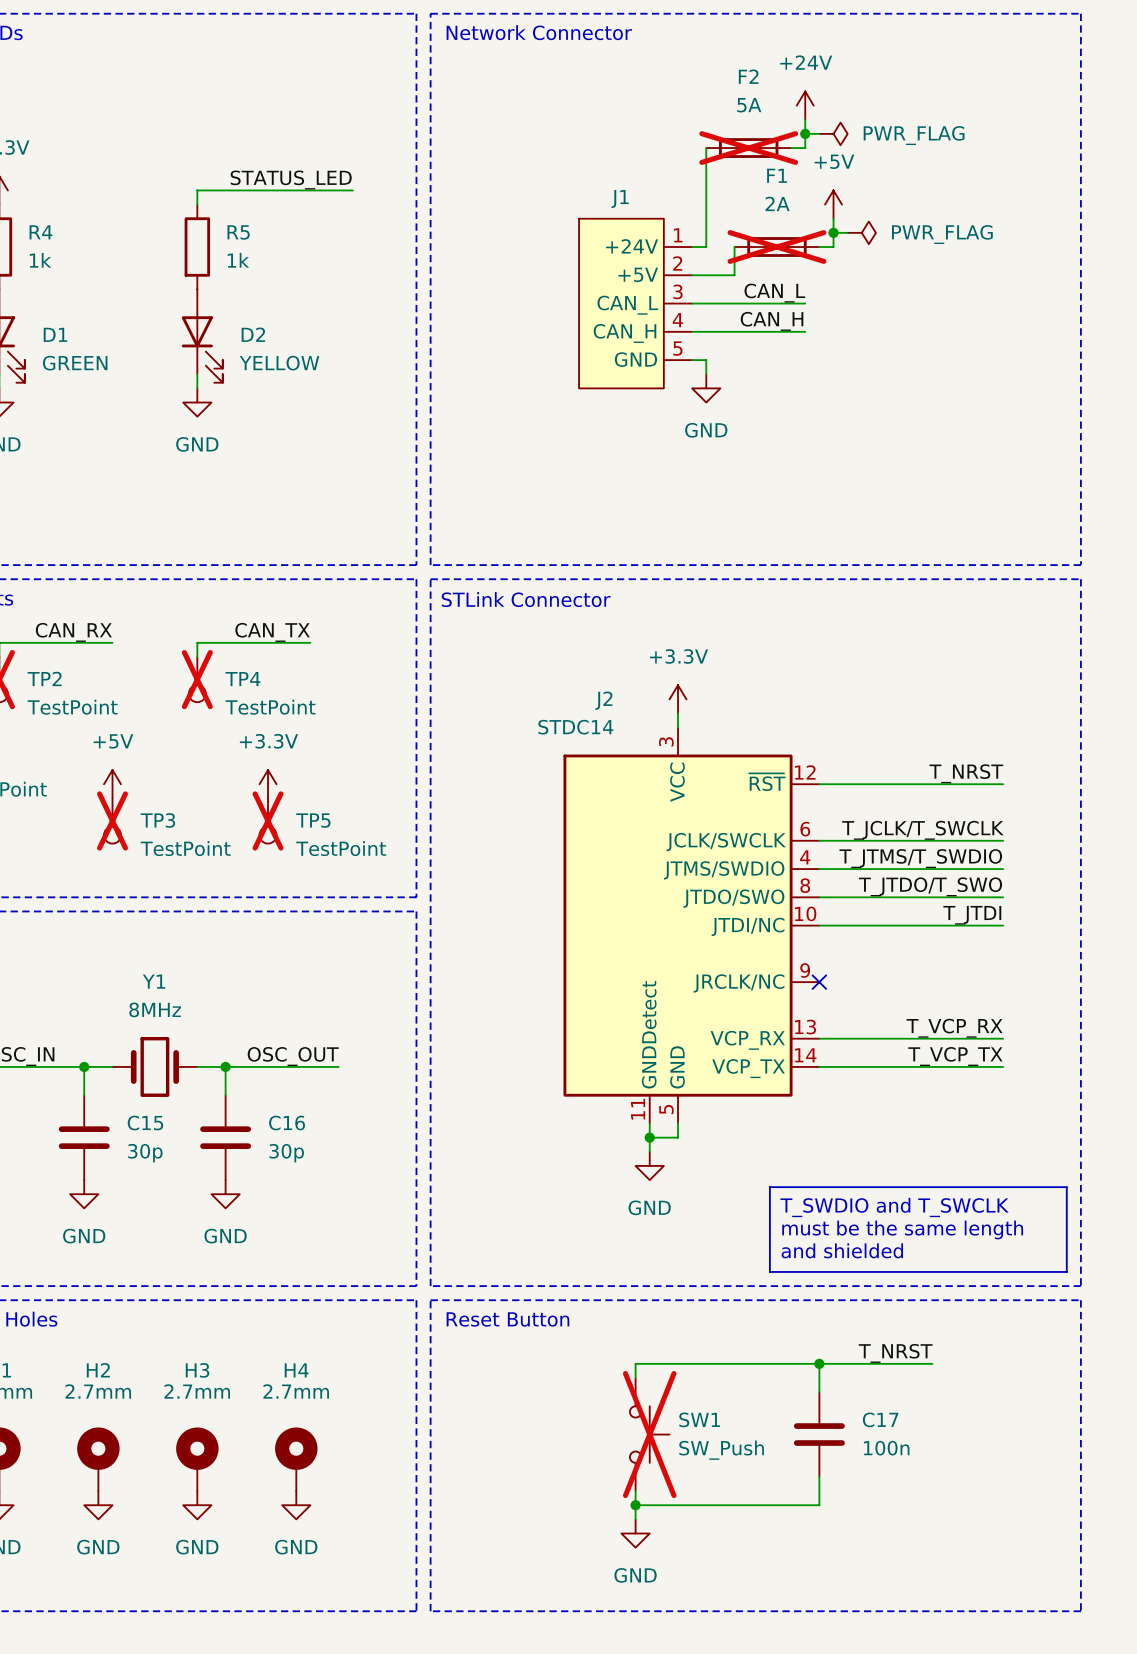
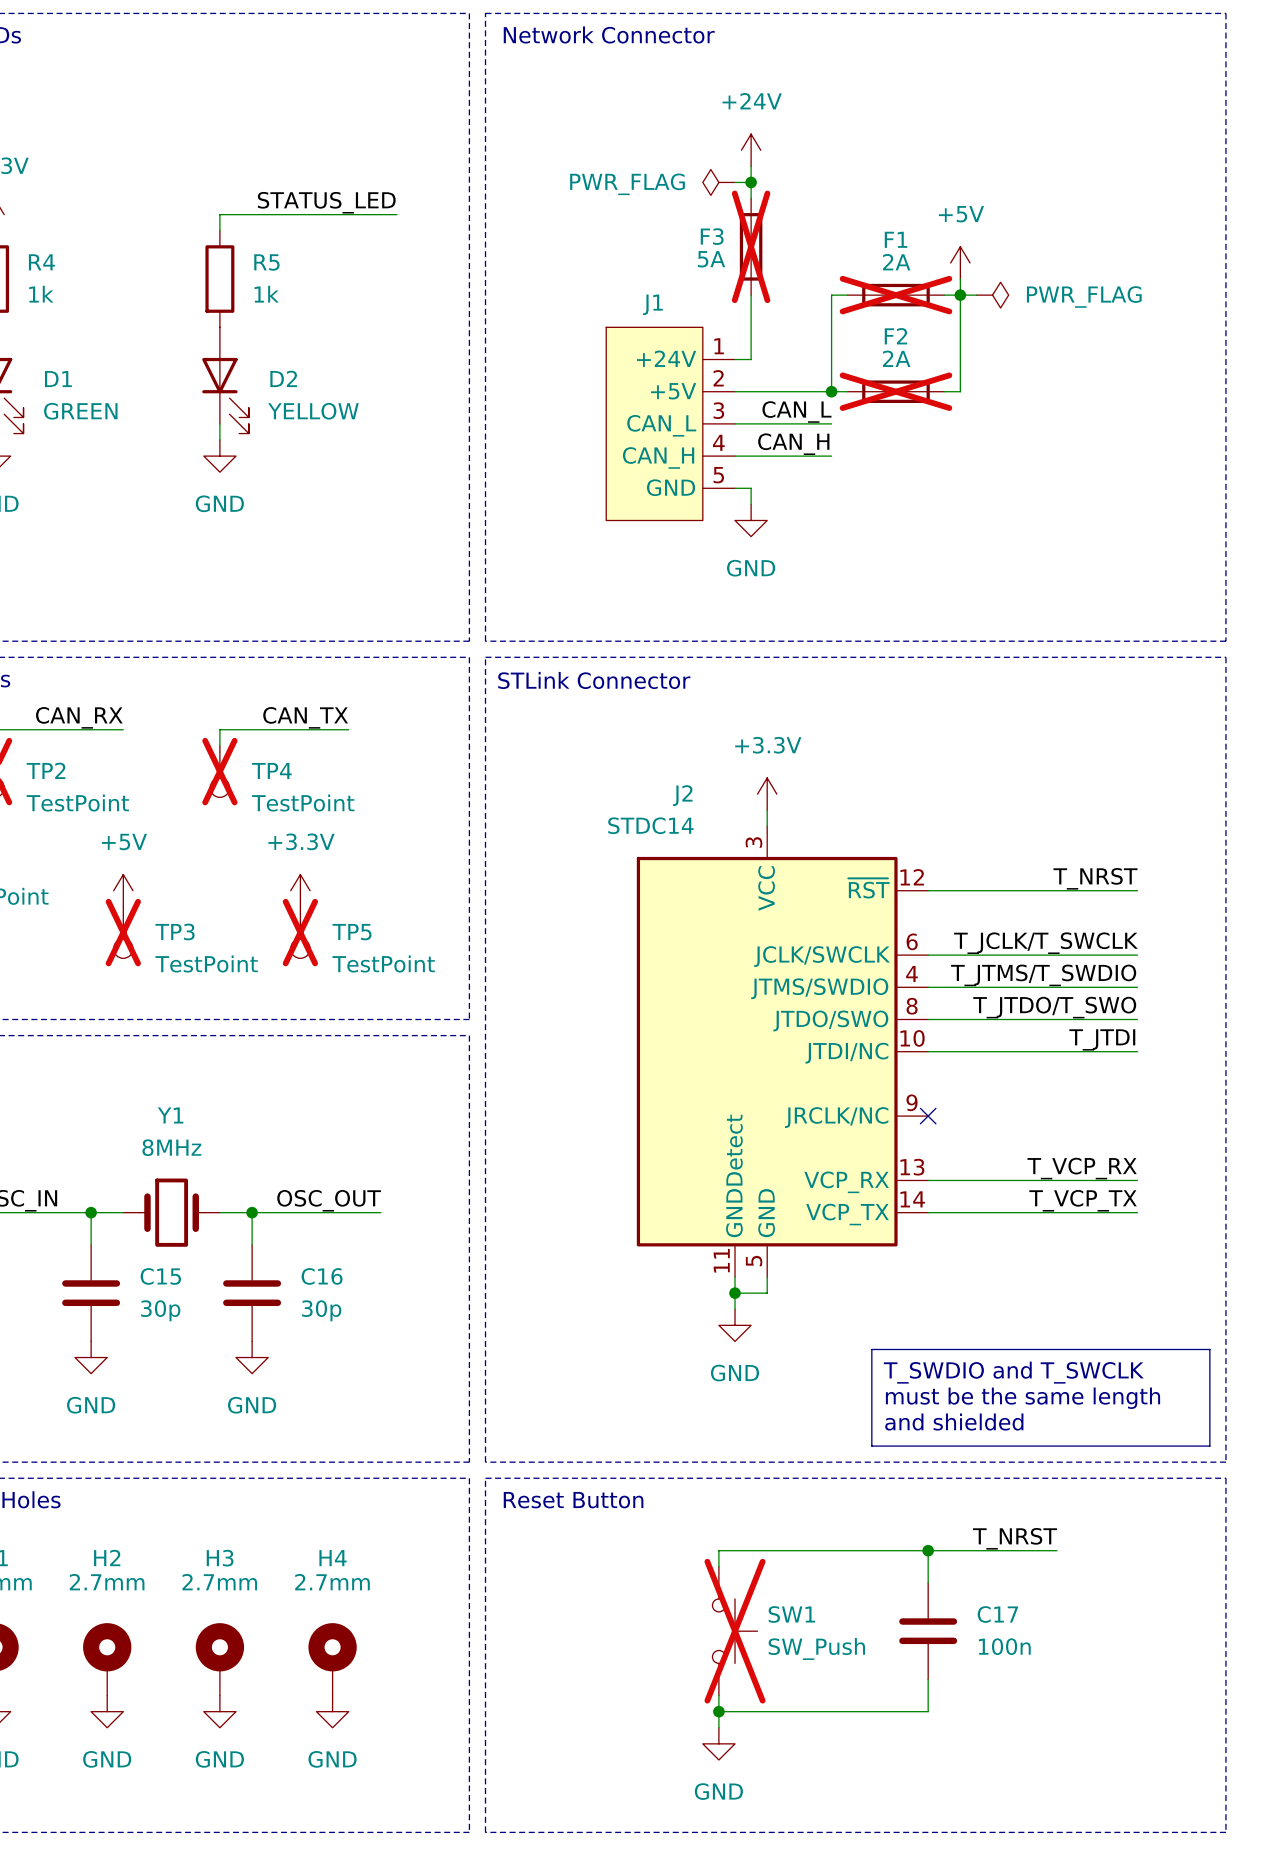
F2 name position: F2 (748, 76) -> F2 (895, 336)
F2 value: 5A (749, 105) -> 2A (896, 358)
power symbol position: +24V (805, 105) -> +24V (751, 150)
wire: (805, 119) (805, 148) (791, 148) -> none
wire: (805, 133) (819, 133) -> (735, 182) (751, 182)
junction: (805, 133) -> none
power symbol: PWR_FLAG (833, 133) -> none
wire: none -> (751, 166) (751, 198)
wire: (706, 148) (706, 247) (692, 247) -> (960, 279) (960, 391) (944, 391)
F2 position: (748, 148) -> (895, 391)
power symbol: none -> PWR_FLAG (718, 182)
junction: none -> (751, 182)
F1 name position: F1 (777, 175) -> F1 (896, 239)
F1 value position: 2A (777, 203) -> 2A (896, 262)
power symbol position: +5V (833, 204) -> +5V (960, 262)
F3: none -> 5A (751, 246)
wire: (833, 218) (833, 247) (819, 247) -> none
wire: (833, 232) (847, 232) -> none
junction position: (833, 232) -> (960, 295)
power symbol position: PWR_FLAG (861, 232) -> PWR_FLAG (992, 295)
wire: (734, 247) (734, 261) -> (847, 295) (831, 295)
F1 position: (776, 247) -> (895, 295)
wire: none -> (944, 295) (976, 295)
wire: (692, 275) (734, 275) -> (831, 391) (831, 311)
label position: CAN_L (774, 293) -> CAN_L (796, 412)
J1 position: (635, 303) -> (670, 423)
wire: (692, 303) (805, 303) -> none
label position: CAN_H (772, 321) -> CAN_H (793, 444)
wire: (692, 331) (805, 331) -> none
wire: none -> (735, 391) (847, 391)
junction: none -> (831, 391)
wire: (692, 360) (706, 360) (706, 374) -> (735, 488) (751, 488) (751, 504)
wire: none -> (735, 423) (831, 423)
power symbol position: GND (706, 388) -> GND (751, 520)
wire: none -> (735, 456) (831, 456)

